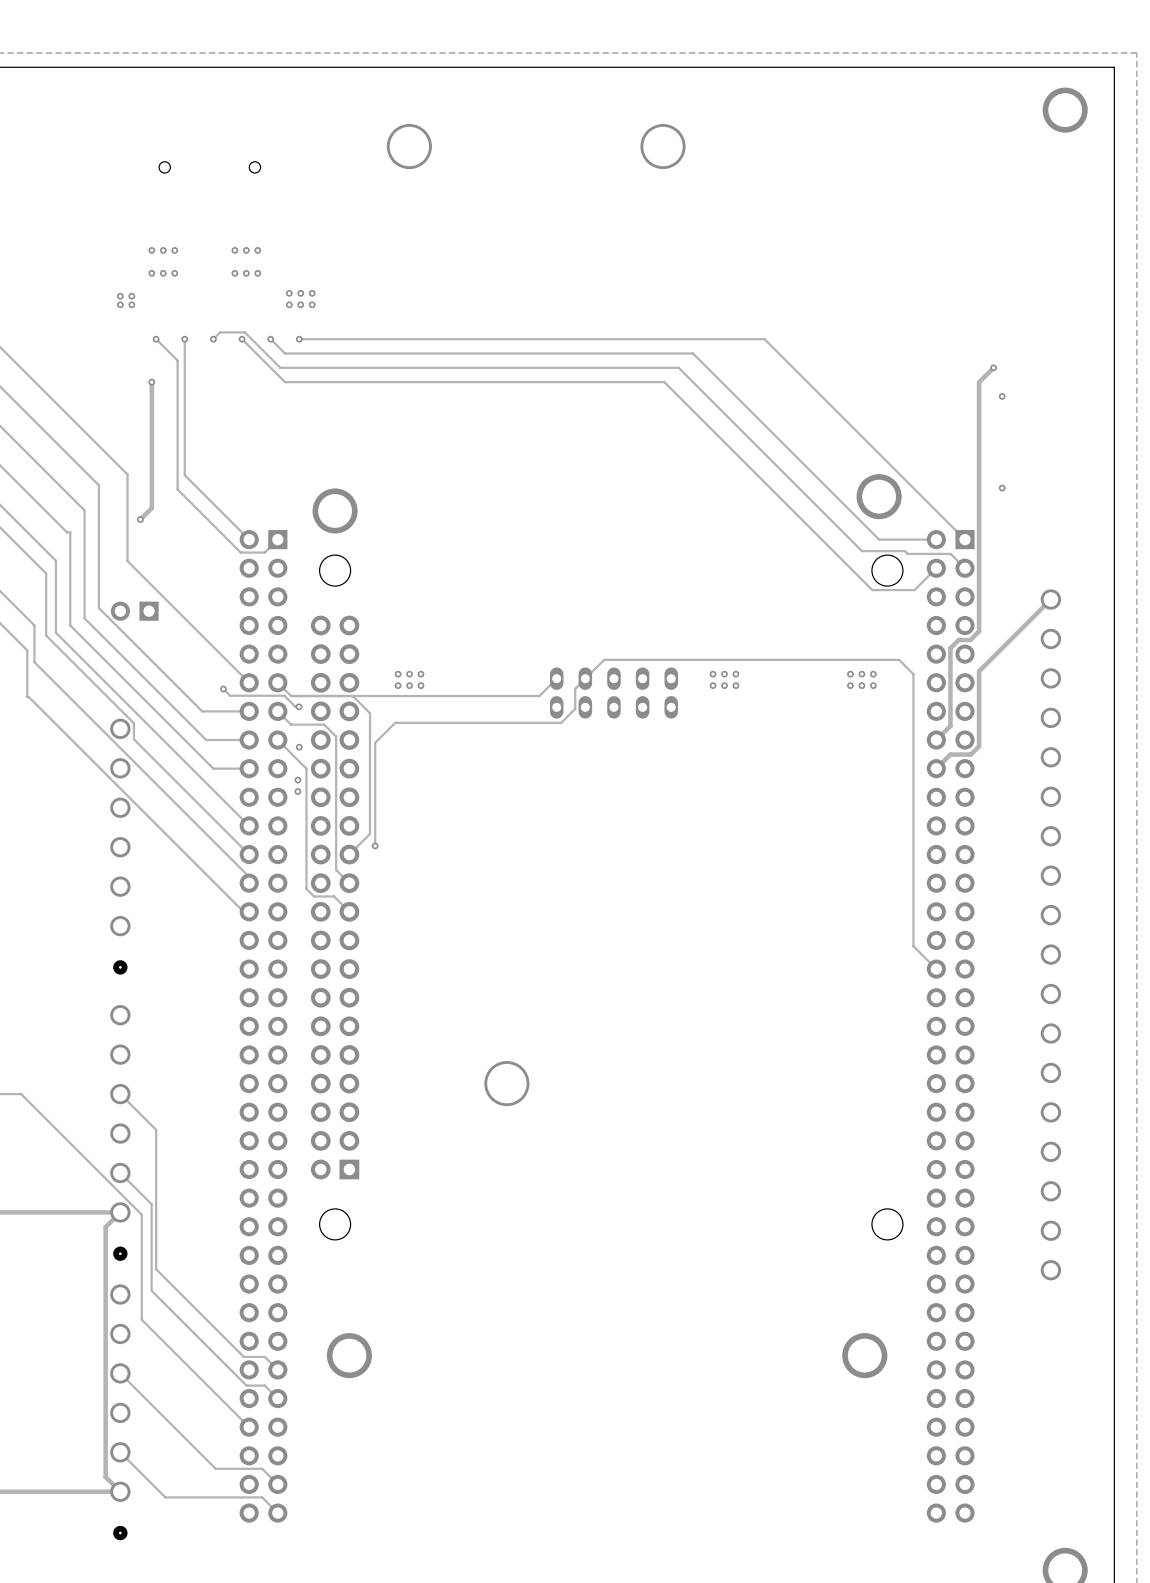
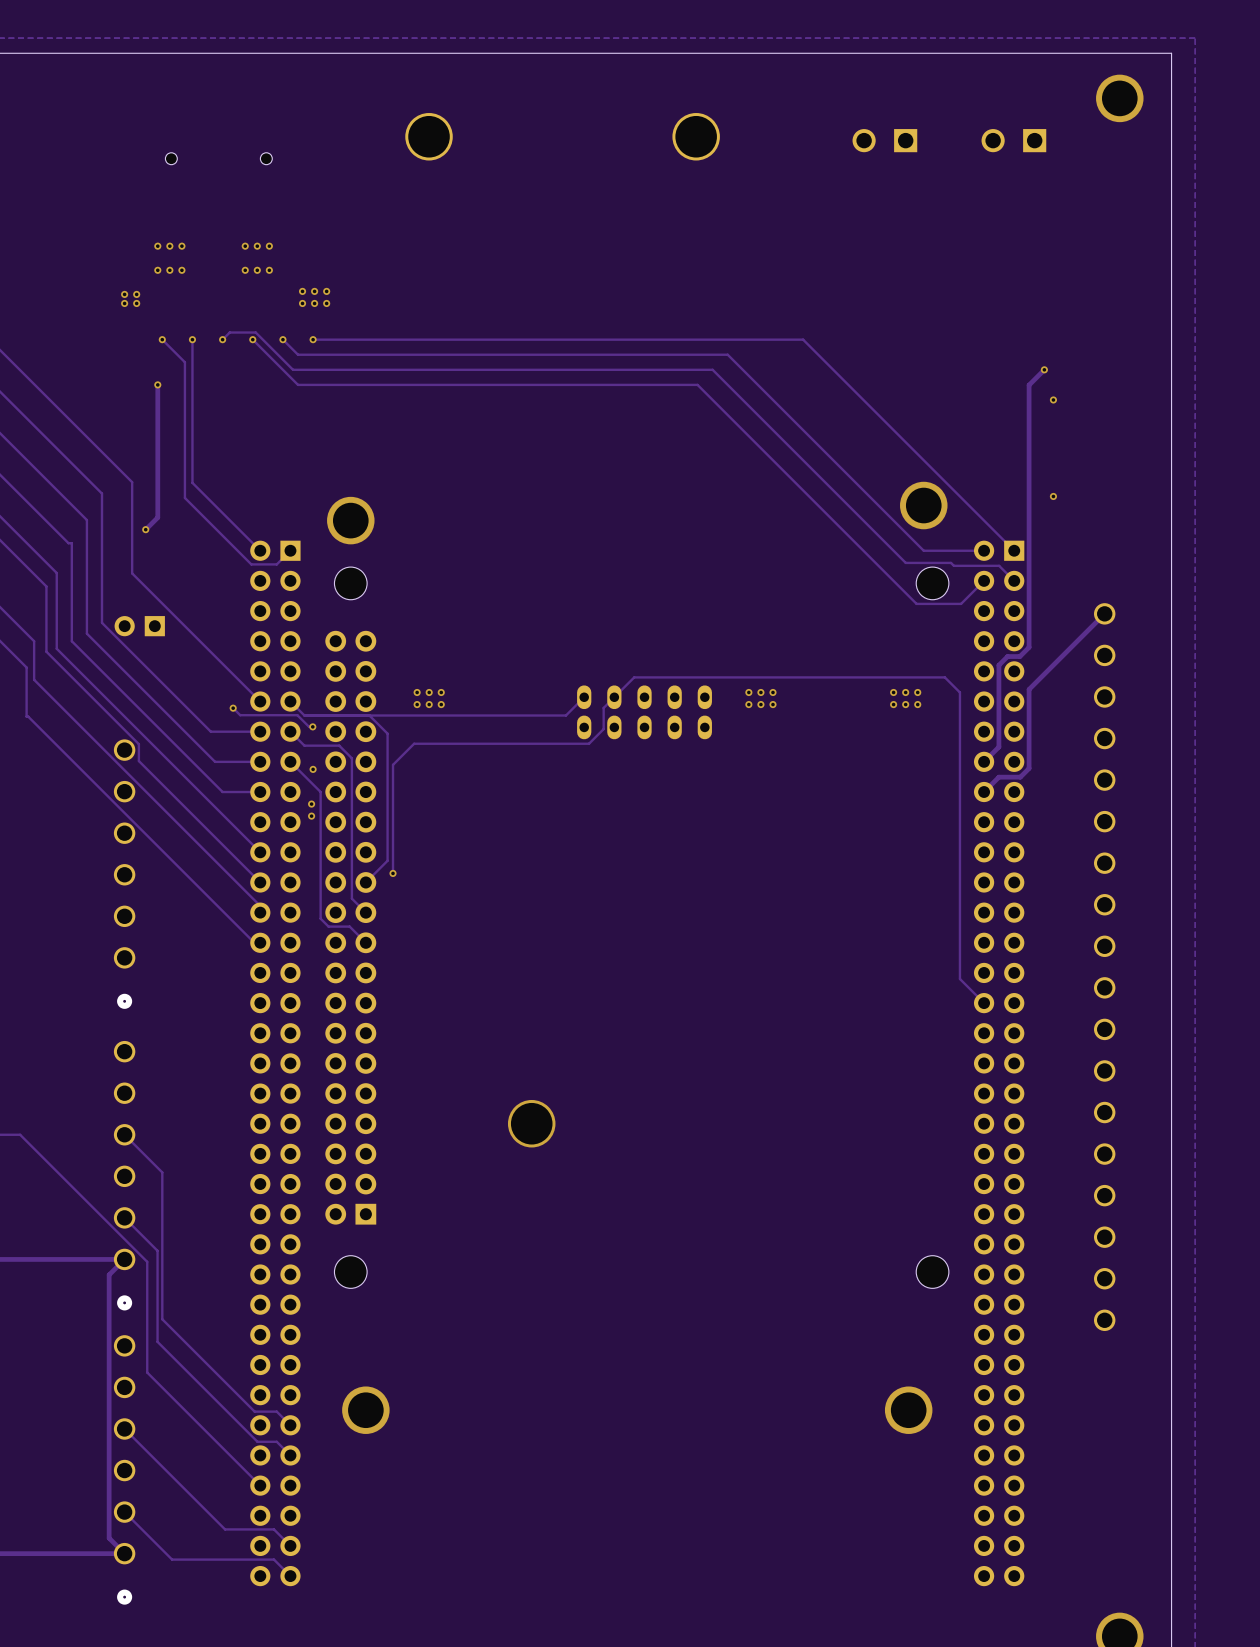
part: none -> (884, 140)
part: none -> (1013, 140)

